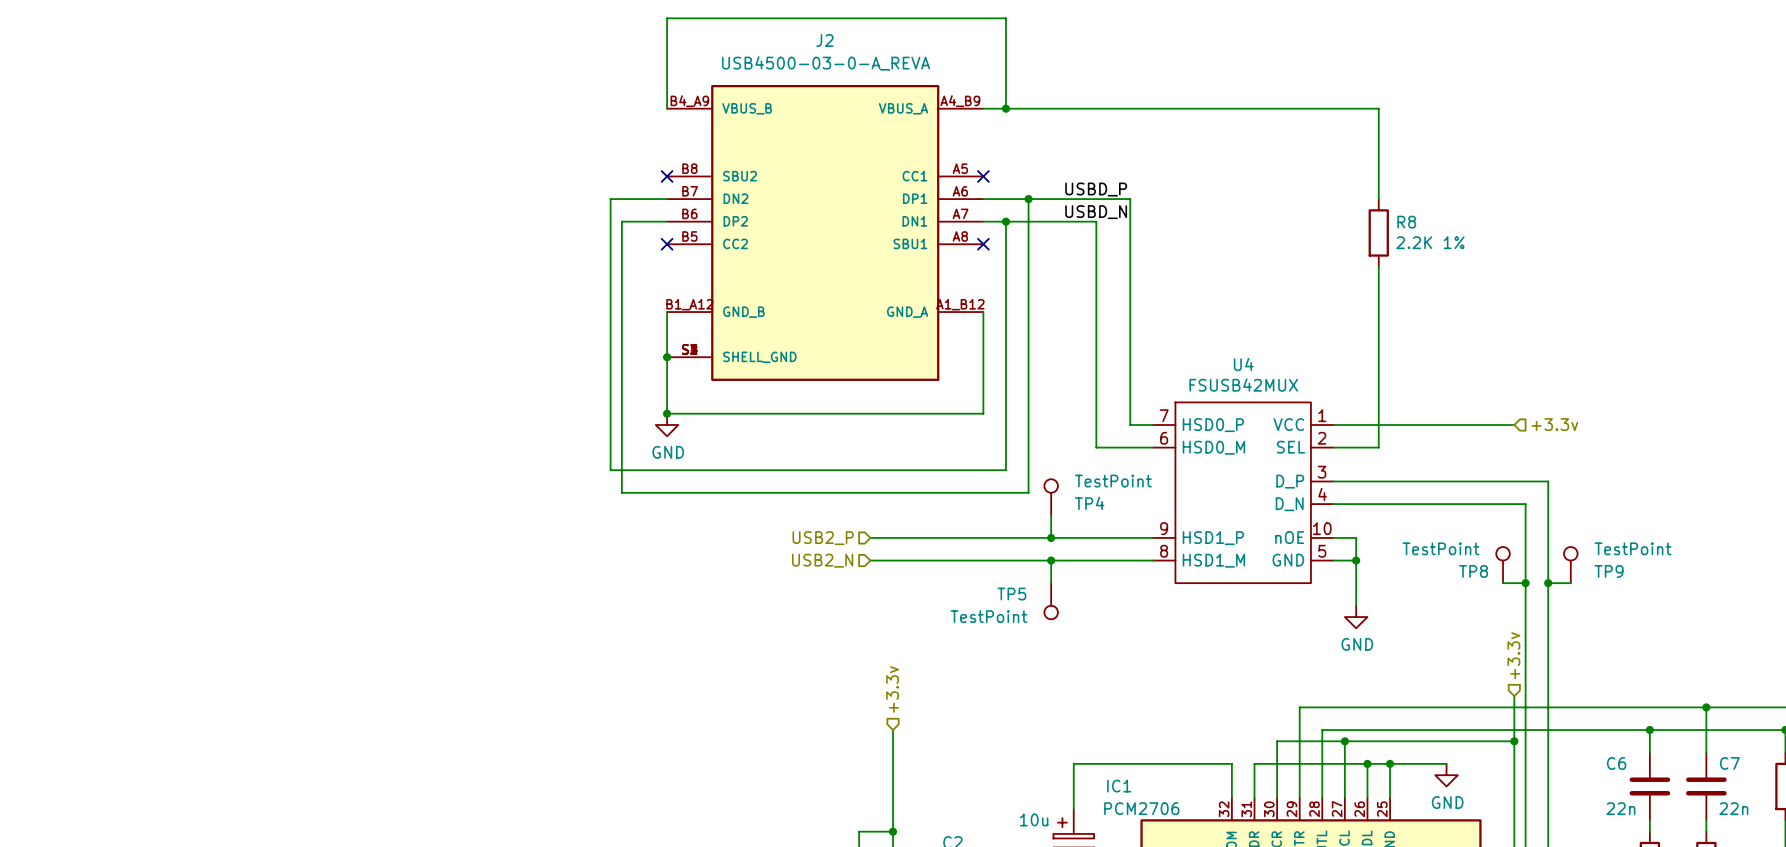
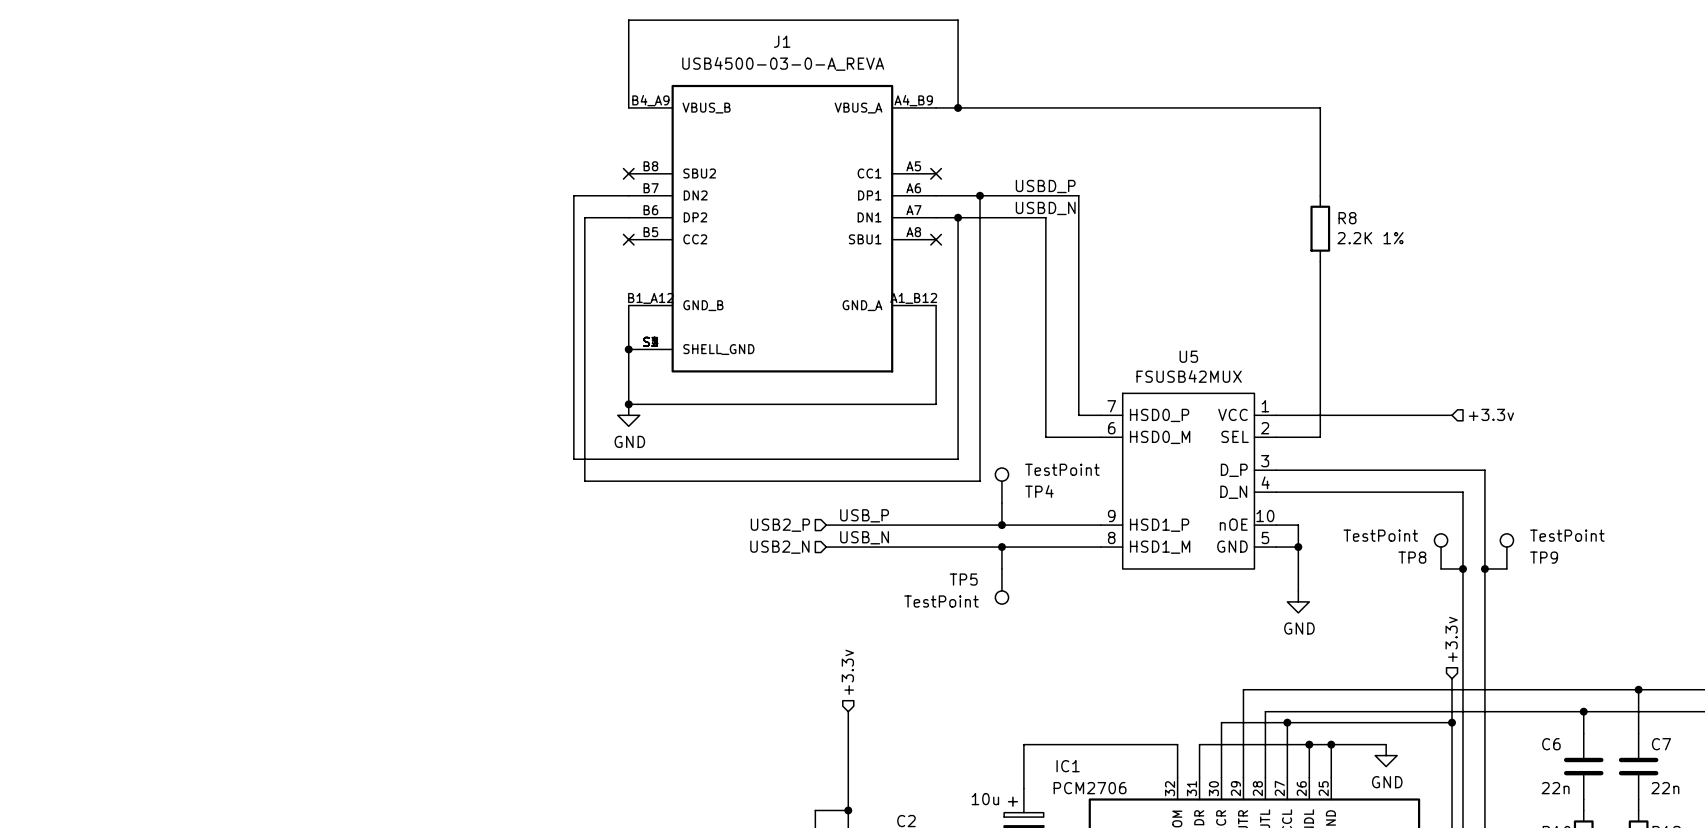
J2 name: J2 (824, 40) -> J1 (782, 41)
U4 name: U4 (1243, 364) -> U5 (1188, 356)
label: none -> USB_P (864, 515)
label: none -> USB_N (864, 537)

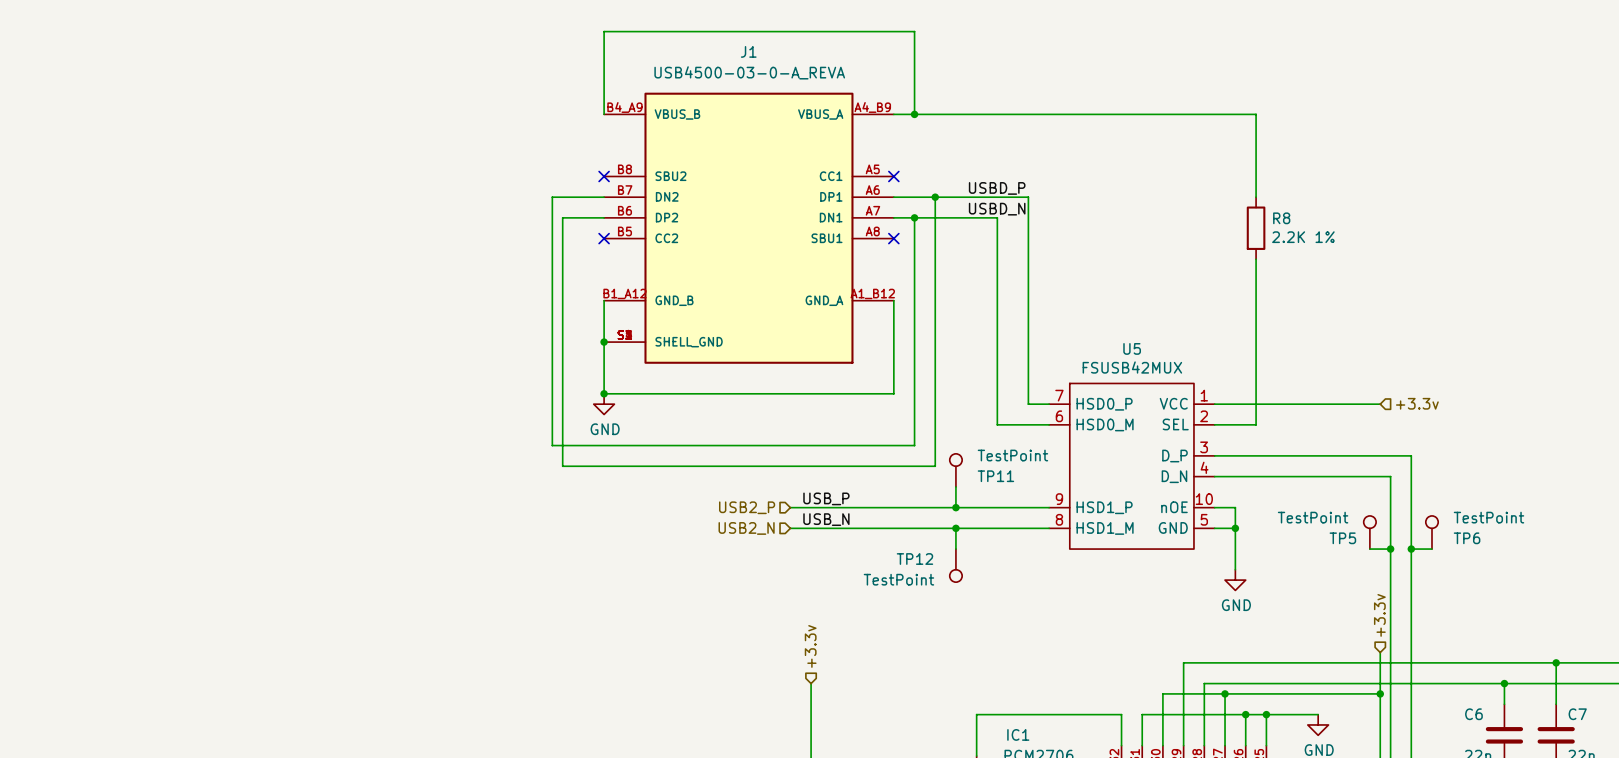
TP4 name: TP4 (1039, 491) -> TP11 (995, 476)
TP8 name: TP8 (1412, 557) -> TP5 (1342, 538)
TP9 name: TP9 (1544, 557) -> TP6 (1467, 538)
TP5 name: TP5 (963, 579) -> TP12 (914, 559)

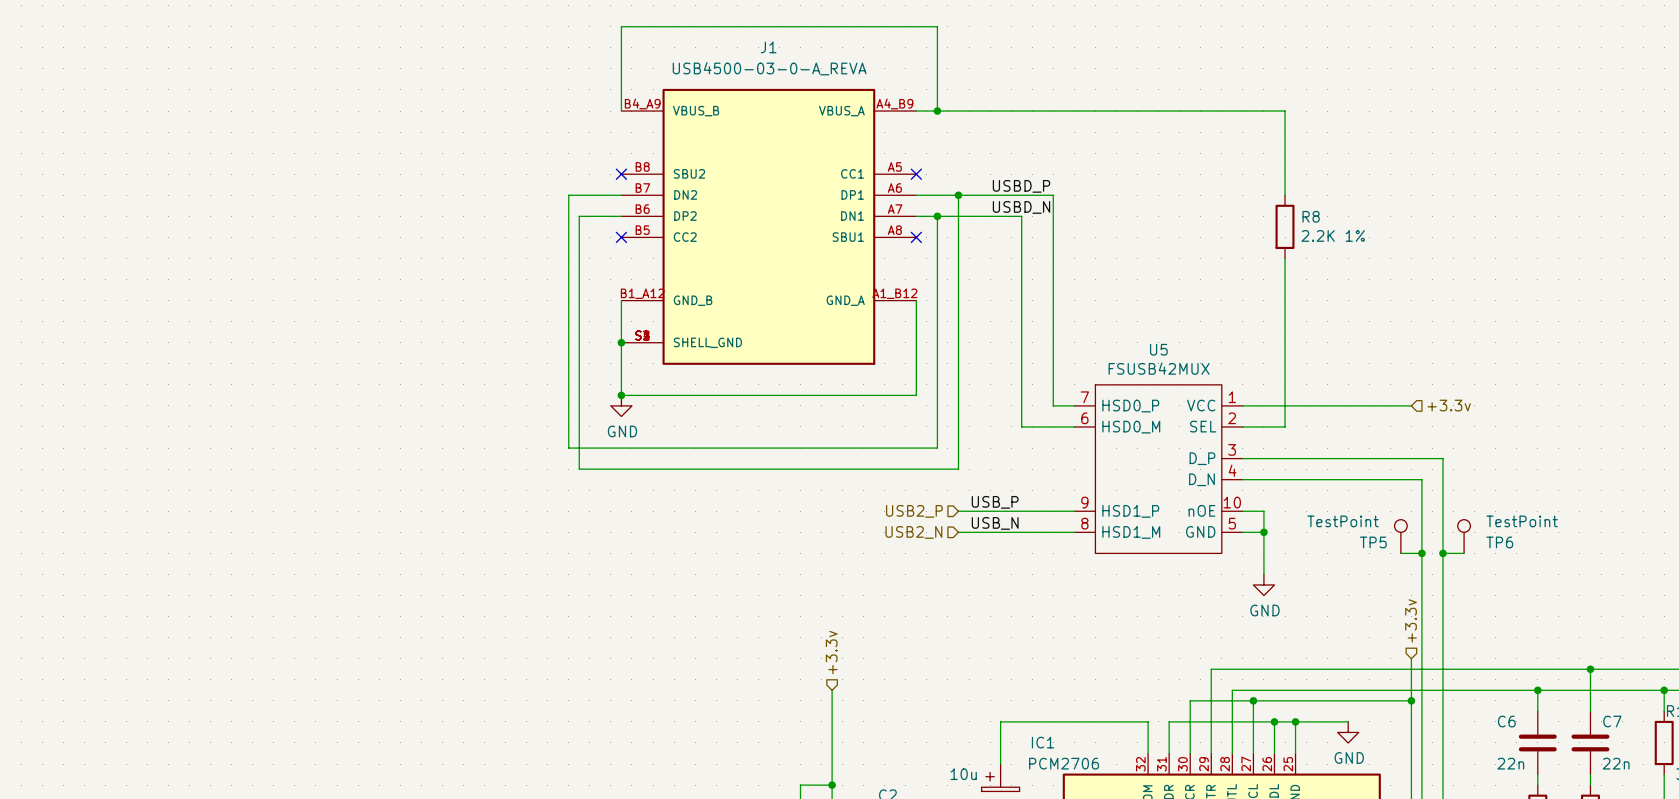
TP11: TestPoint (955, 470) -> none
wire: (955, 486) (955, 507) -> none
label position: USB_P (826, 498) -> USB_P (995, 502)
hierarchical label position: USB2_P (747, 507) -> USB2_P (914, 511)
wire: (790, 507) (935, 507) -> none
junction: (955, 507) -> none
label position: USB_N (826, 519) -> USB_N (995, 523)
hierarchical label position: USB2_N (746, 528) -> USB2_N (913, 532)
wire: (790, 528) (935, 528) -> none
wire: (955, 528) (955, 549) -> none
junction: (955, 528) -> none
TP12: TestPoint (955, 565) -> none

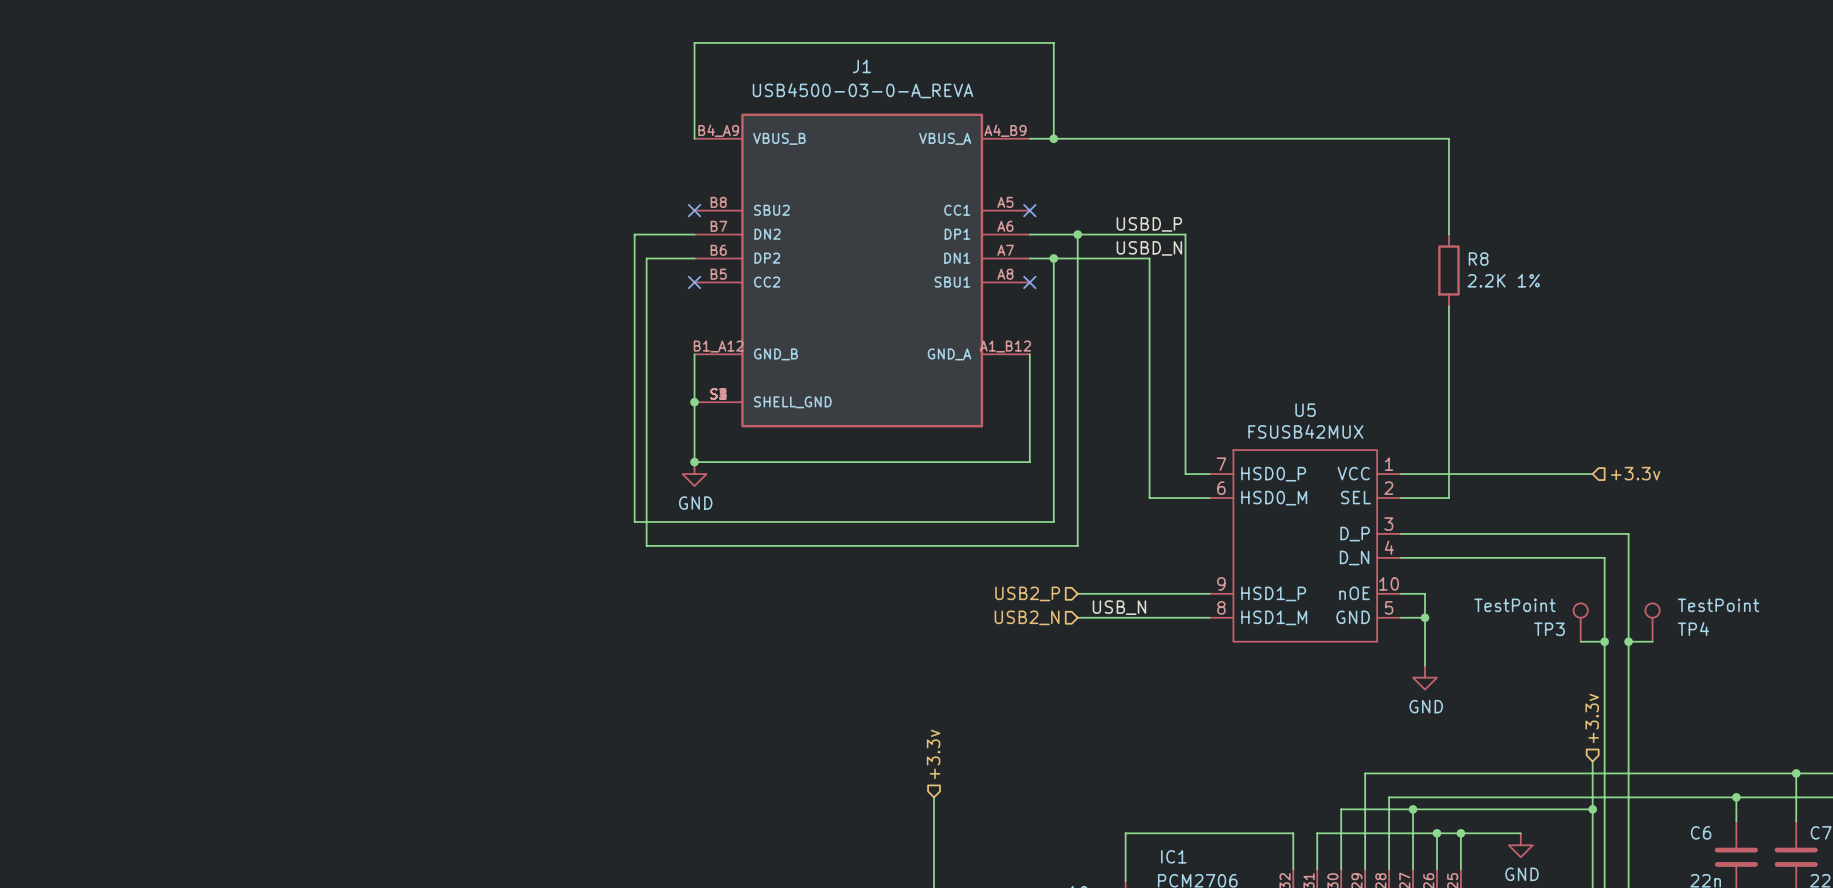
label: USB_P (995, 502) -> none
TP5 name: TP5 (1373, 542) -> TP3 (1549, 629)
TP6 name: TP6 (1499, 542) -> TP4 (1693, 629)

